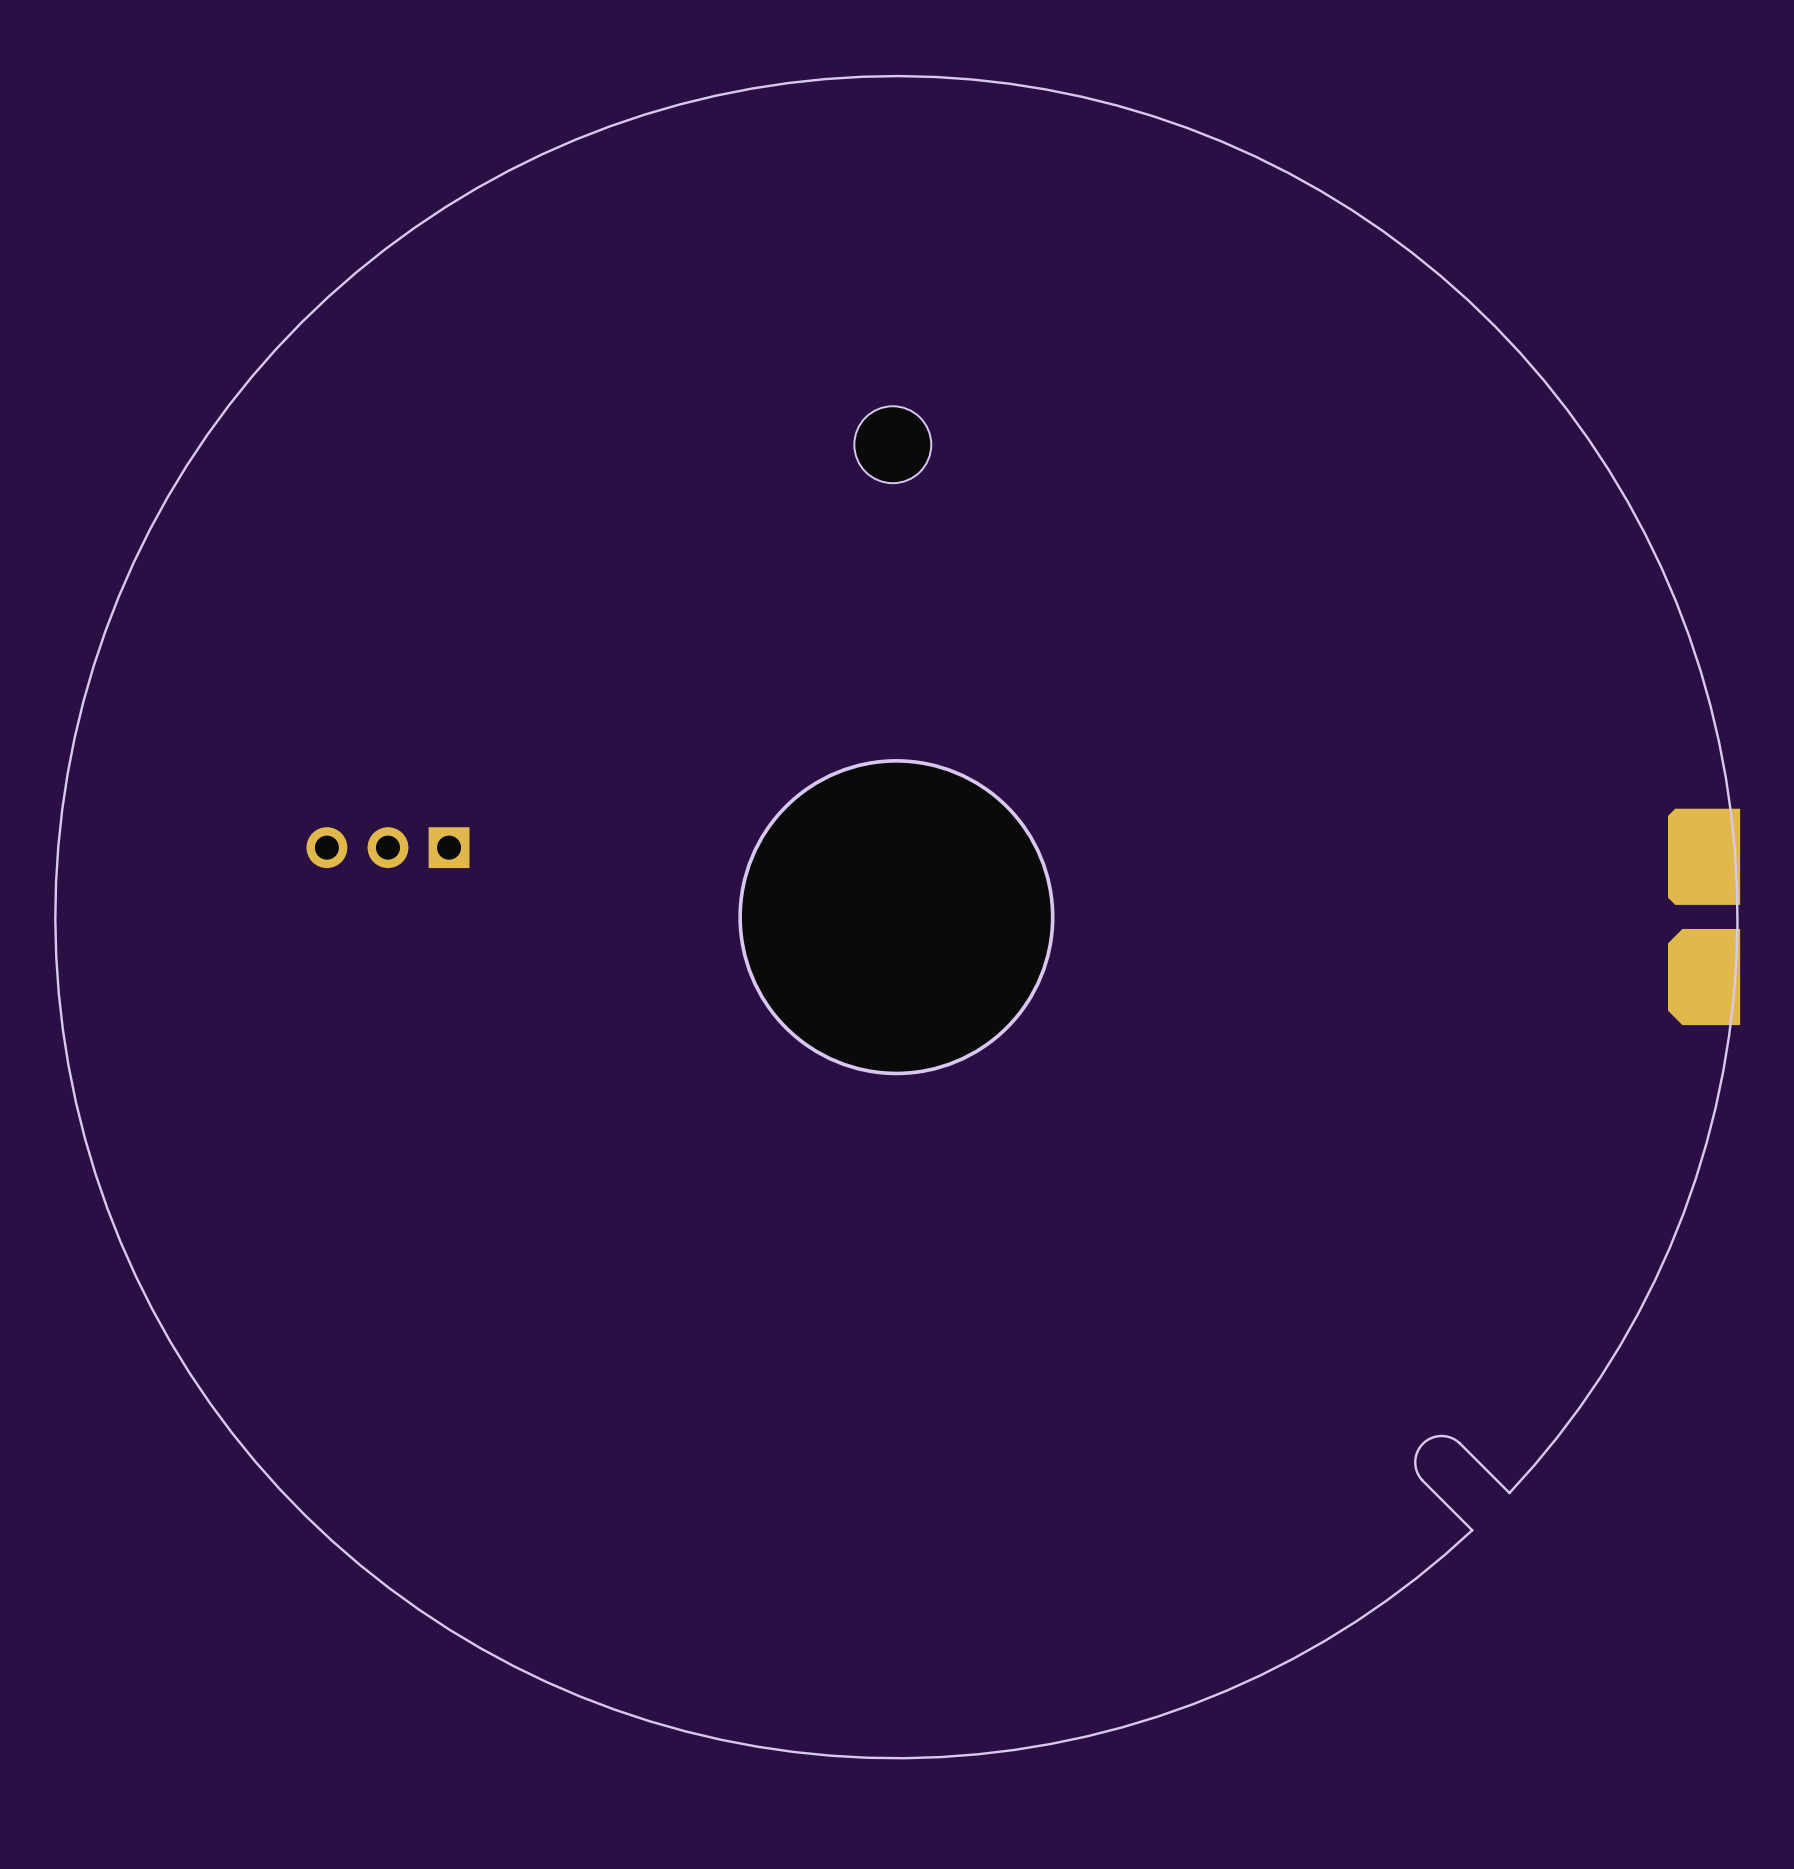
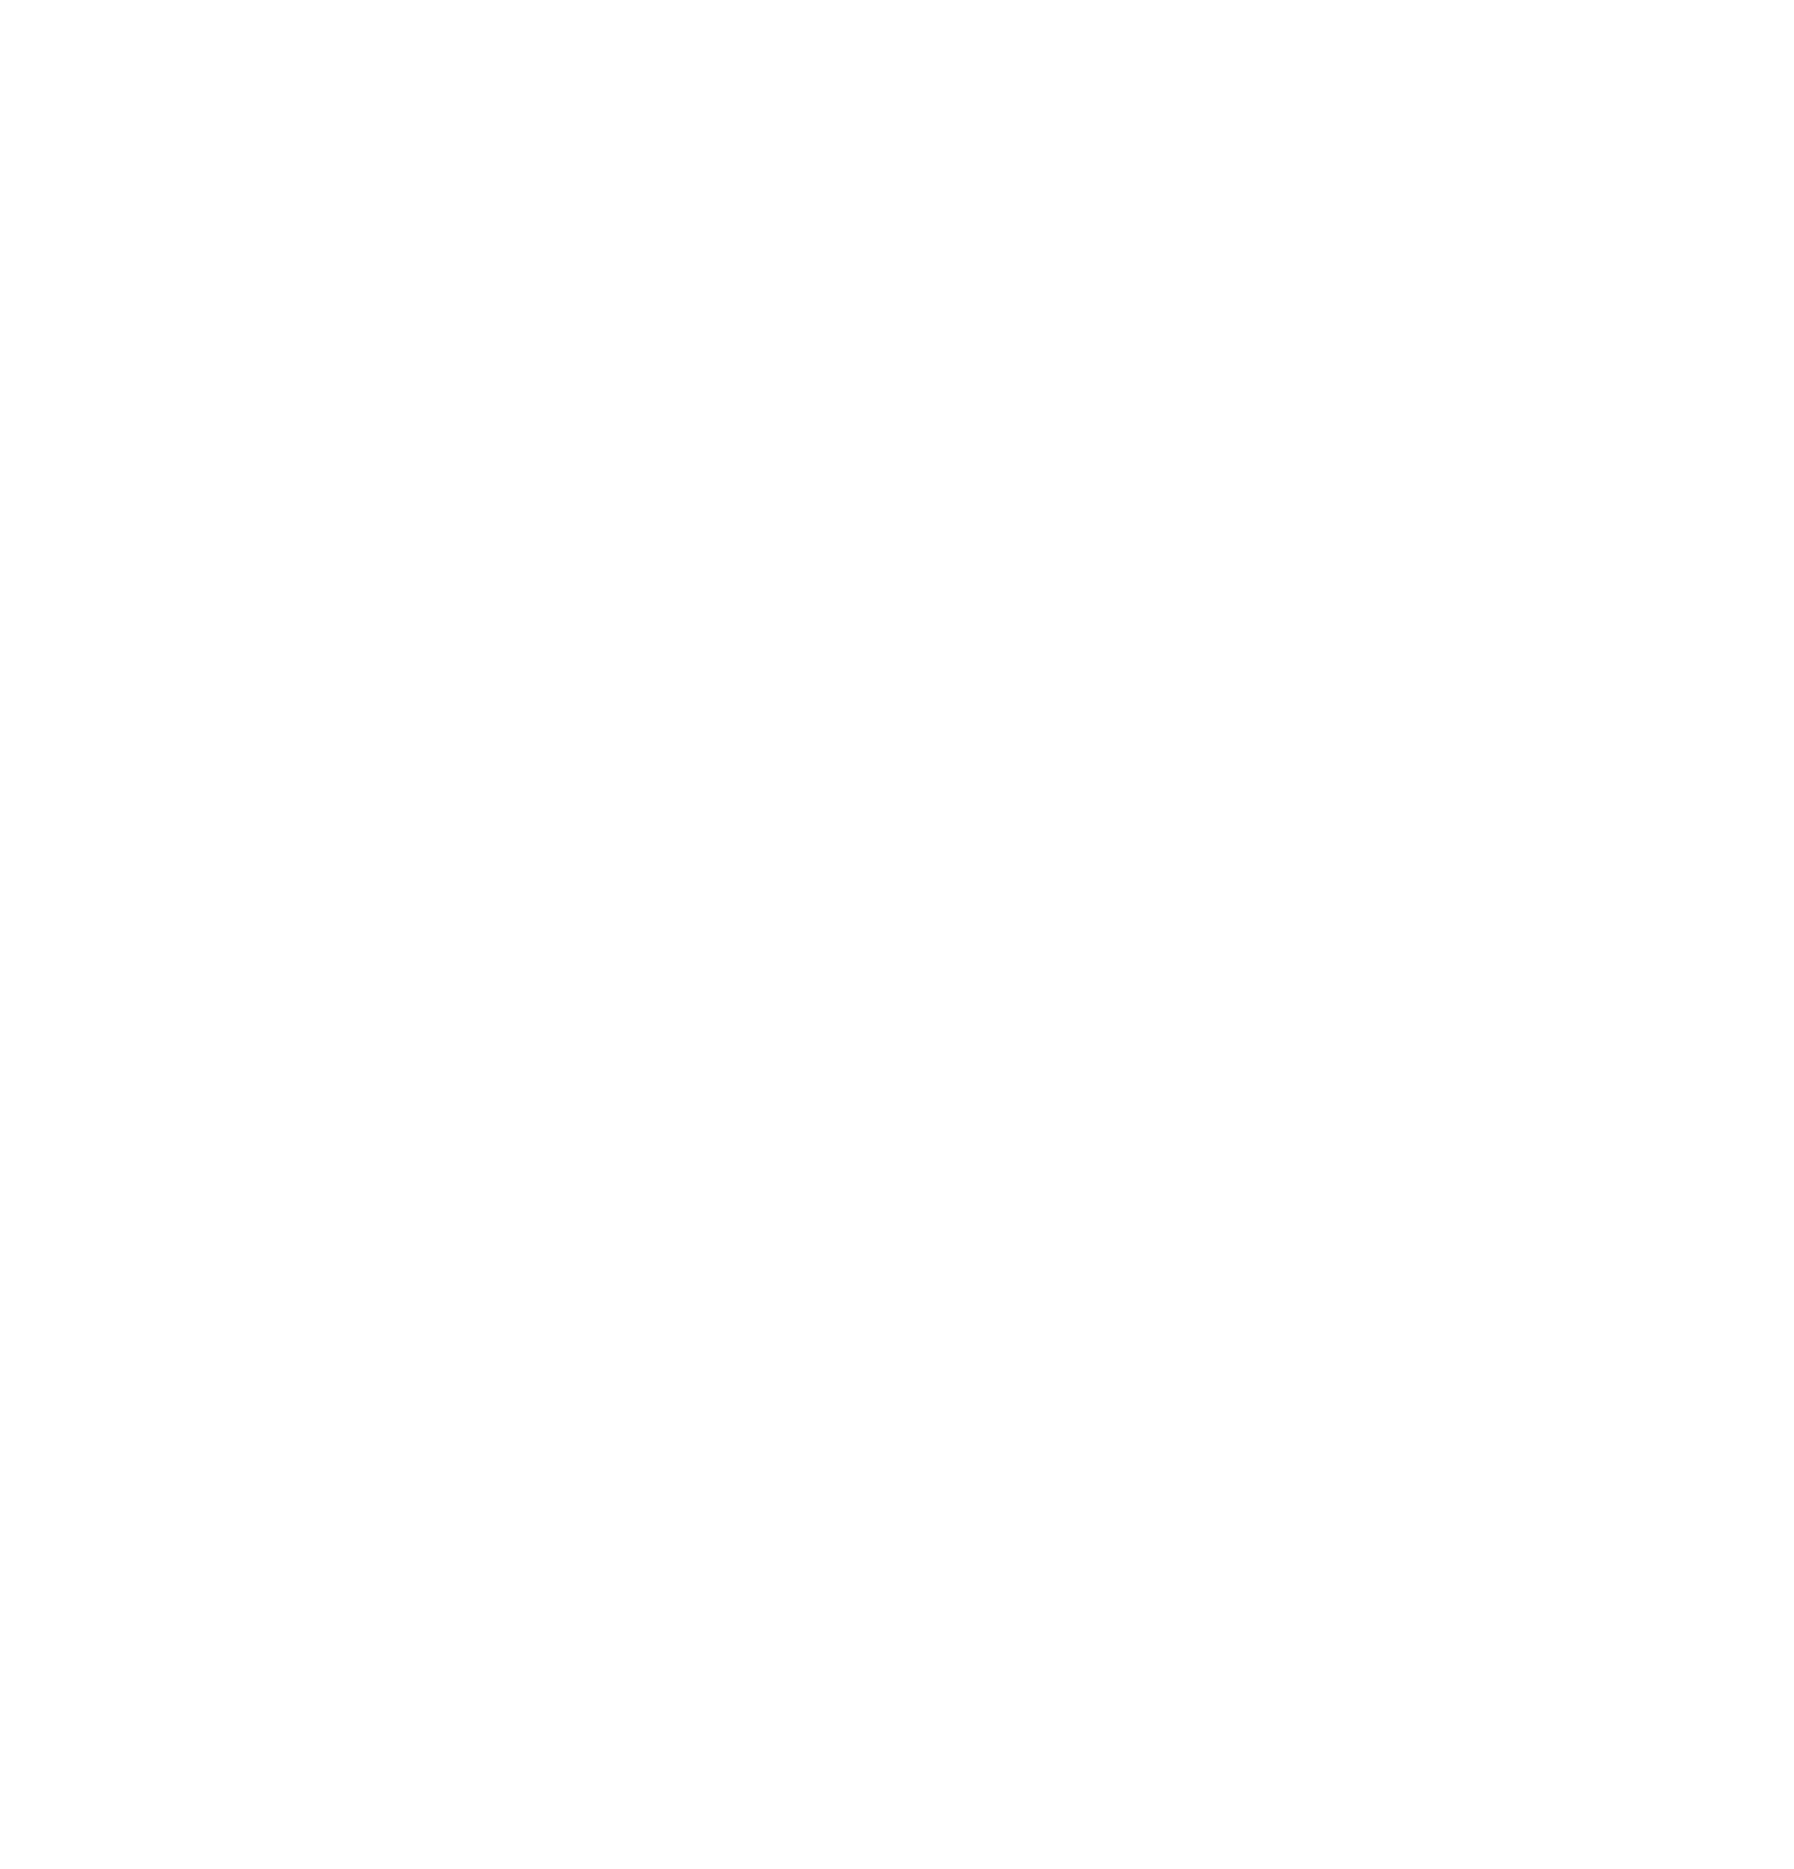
part: (892, 444) -> none
round board edge: [738, 759, 1055, 1076] -> none
part: (387, 847) -> none
part: (896, 916) -> none
part: (1704, 916) -> none
board edge: (1459, 1443) (1509, 1492) (1534, 1465) (1579, 1407) (1619, 1346) (1638, 1313) (1669, 1247) (1683, 1213) (1695, 1178) (1715, 1107) (1723, 1071) (1733, 998) (1737, 925) (1734, 851) (1725, 778) (1719, 742) (1700, 670) (1675, 601) (1661, 567) (1627, 501) (1588, 439) (1567, 409) (1520, 352) (1468, 300) (1440, 276) (1382, 230) (1320, 190) (1255, 156) (1187, 128) (1117, 105) (1081, 96) (1009, 83) (935, 76) (862, 76) (788, 82) (716, 95) (645, 114) (575, 139) (542, 154) (476, 188) (414, 227) (384, 249) (328, 296) (276, 349) (228, 405) (207, 435) (167, 497) (133, 562) (105, 630) (83, 701) (67, 773) (62, 809) (56, 882) (56, 956) (62, 1029) (68, 1066) (84, 1138) (107, 1208) (135, 1276) (170, 1341) (210, 1403) (255, 1461) (305, 1515) (332, 1540) (388, 1587) (449, 1629) (513, 1666) (546, 1682) (615, 1709) (650, 1721) (721, 1739) (793, 1752) (830, 1755) (904, 1758) (977, 1754) (1014, 1749) (1086, 1736) (1157, 1716) (1192, 1704) (1260, 1675) (1293, 1658) (1356, 1621) (1416, 1578) (1472, 1530) (1422, 1480) (1415, 1465) (1417, 1452) (1428, 1439) (1444, 1436) (1451, 1437) (1454, 1439) (1457, 1440) (1459, 1443) -> none

